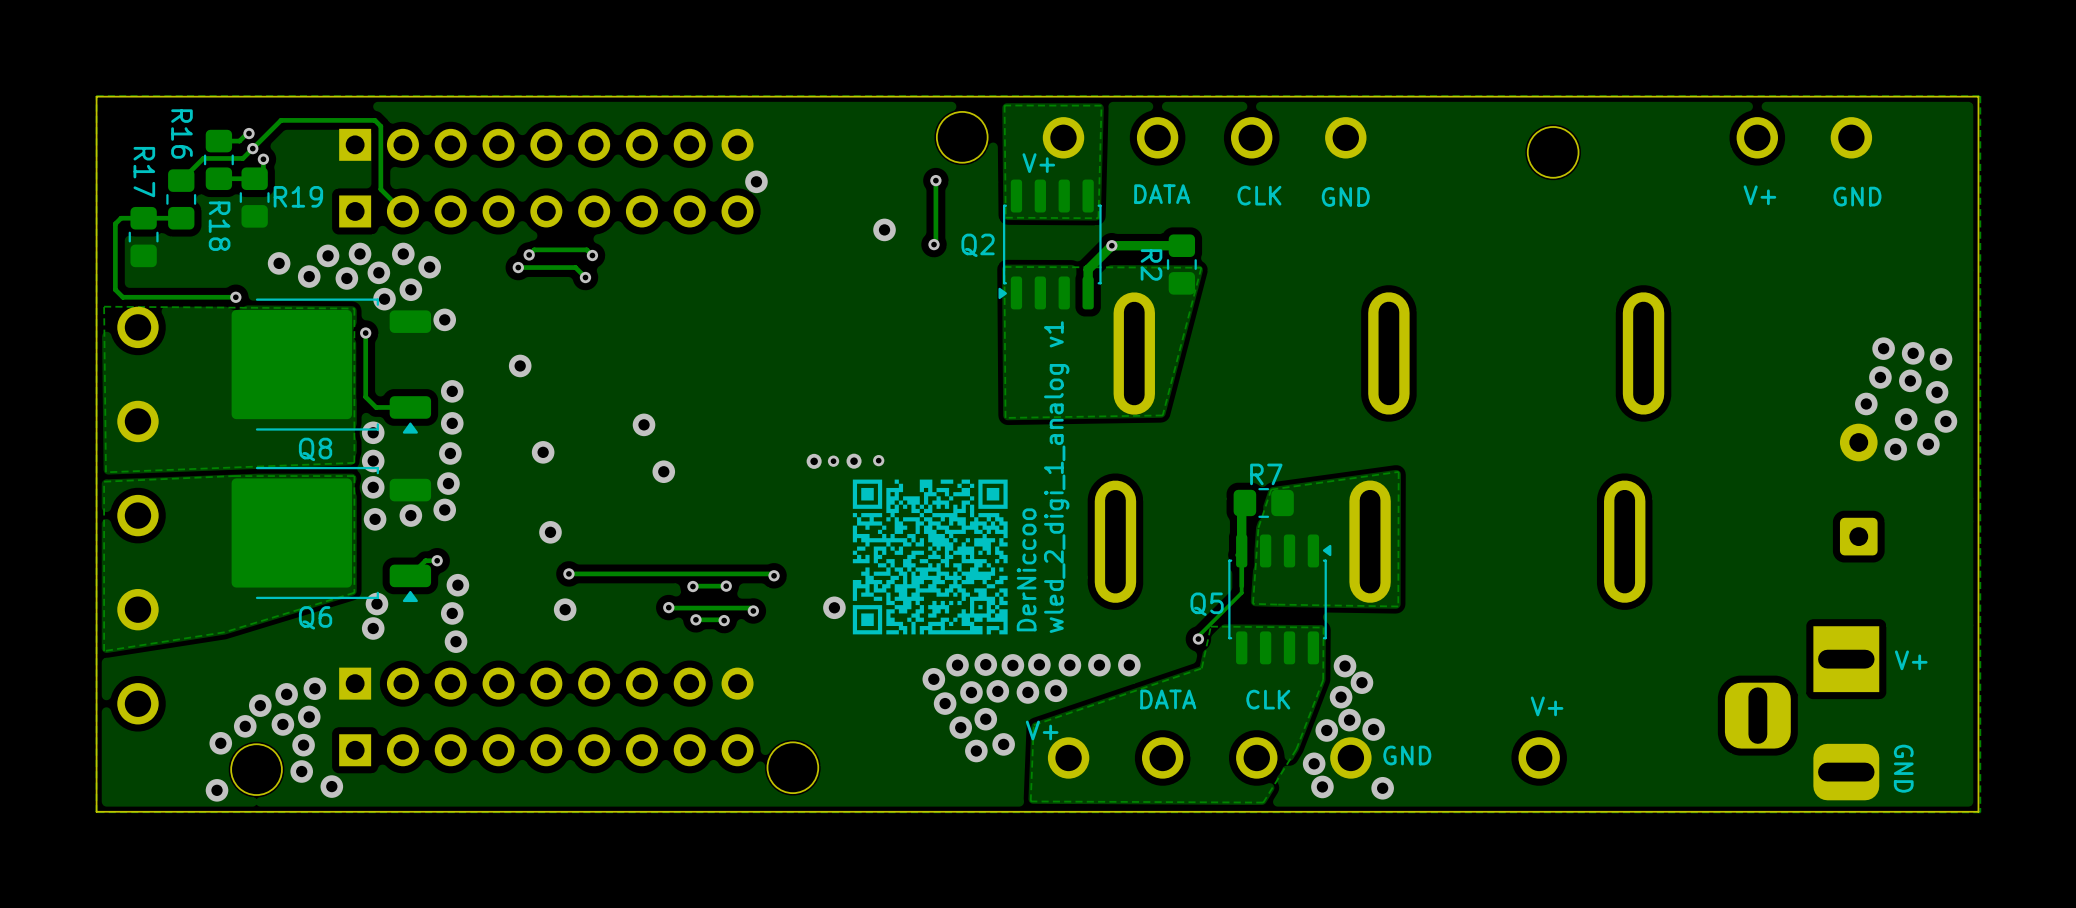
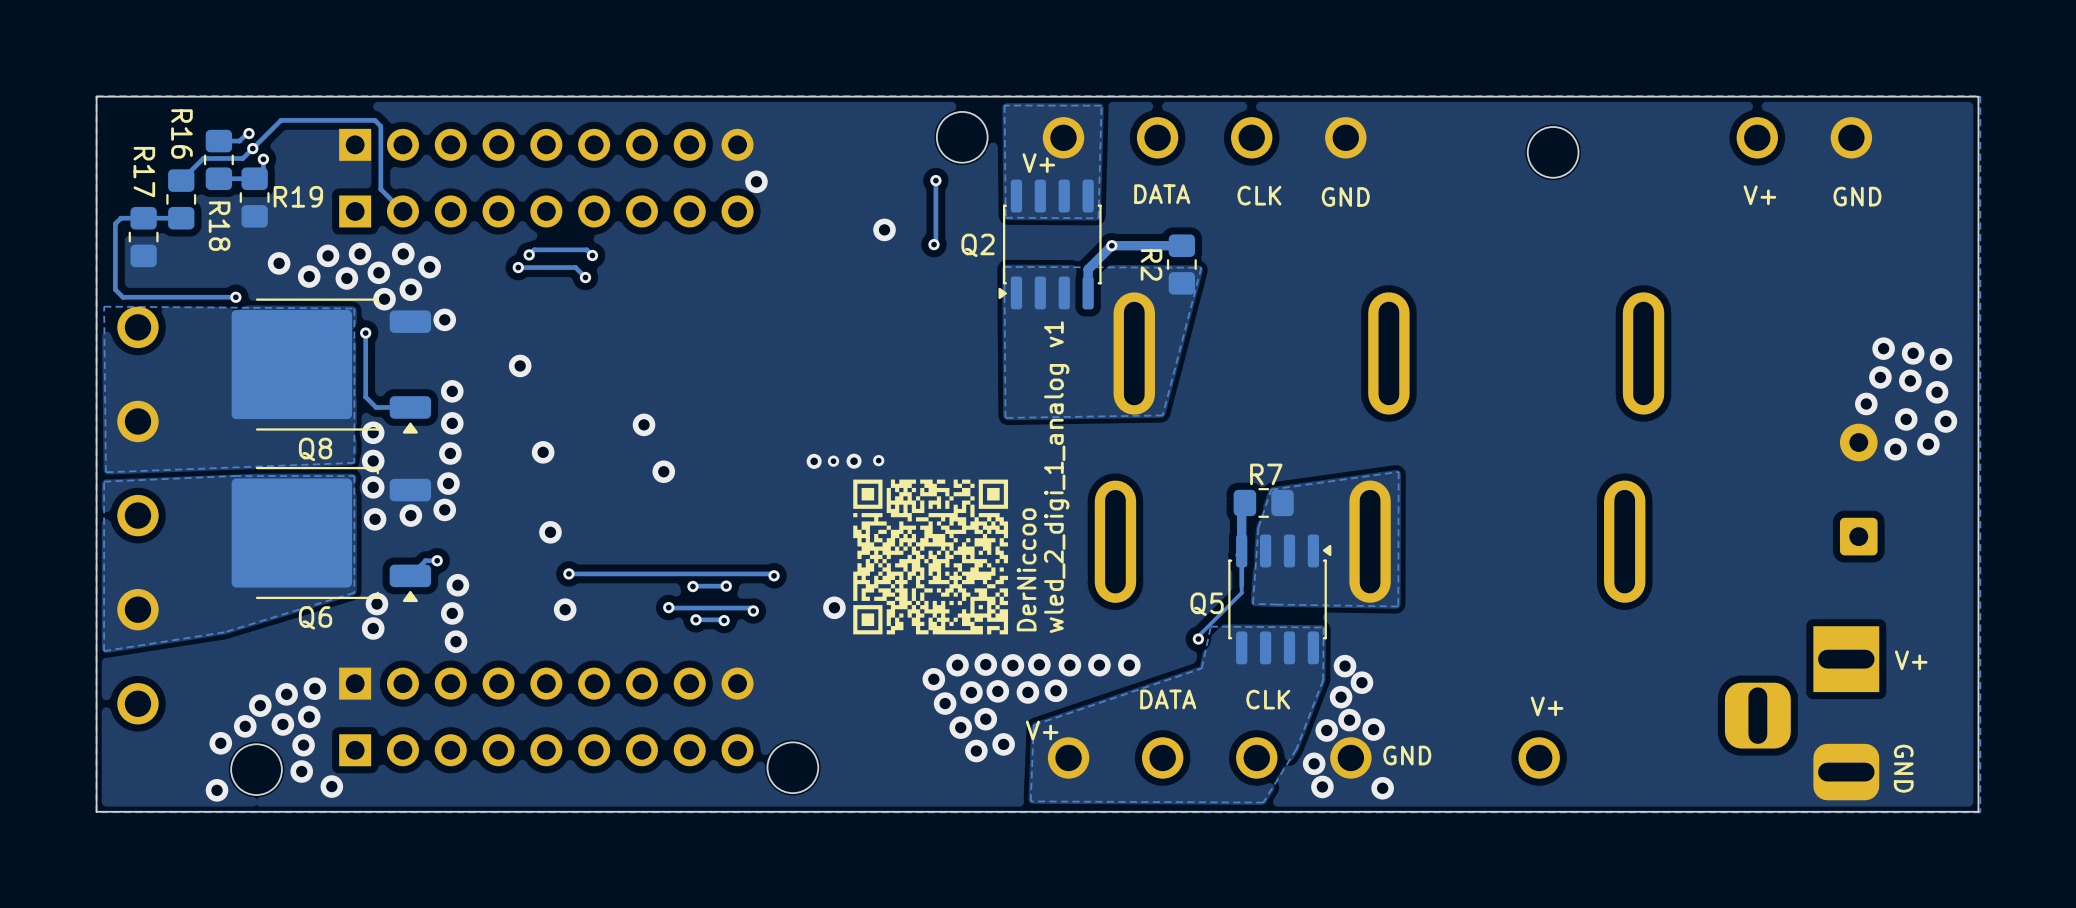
drawing shape: [852, 479, 1008, 635] -> [853, 479, 1009, 635]

